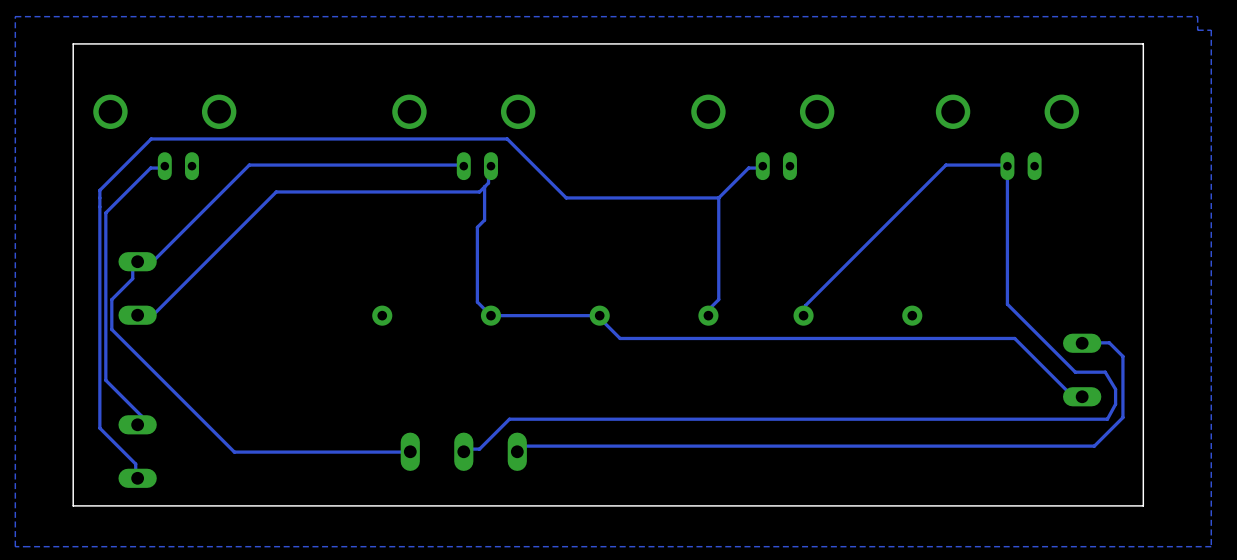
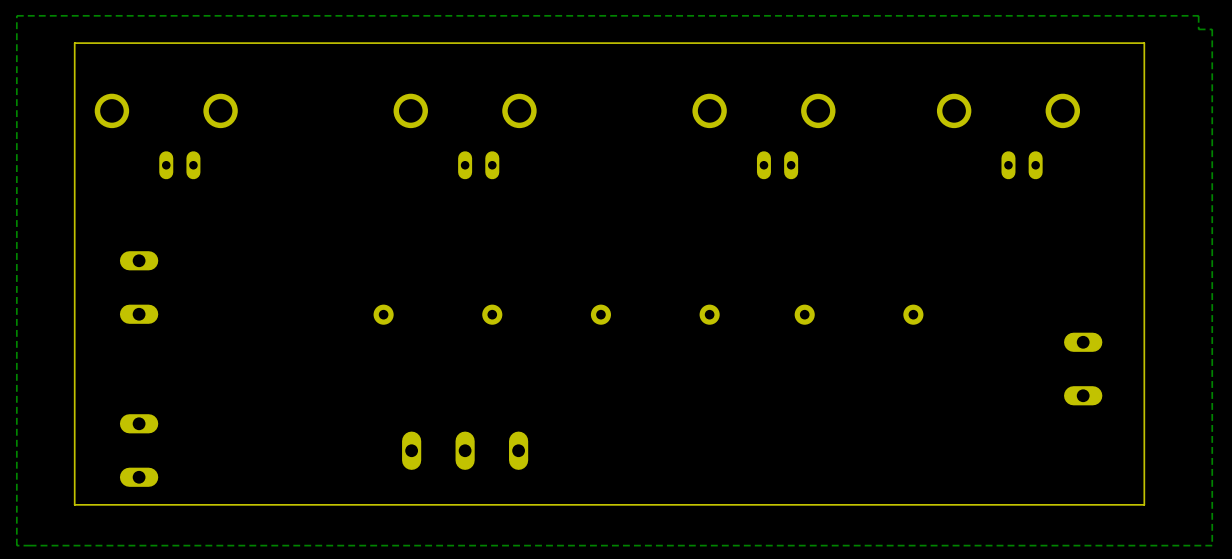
track: (164, 166) (162, 168) (150, 168) (105, 212) (105, 380) (141, 416) (137, 424) -> none
track: (463, 166) (249, 165) (153, 260) (137, 261) (132, 266) (132, 278) (111, 299) (111, 329) (234, 452) (410, 451) -> none
track: (490, 166) (488, 168) (488, 183) (479, 191) (276, 191) (153, 314) (137, 315) -> none
track: (762, 166) (760, 168) (748, 168) (718, 197) -> none
track: (1007, 166) (945, 165) (805, 305) (805, 314) (803, 315) -> none
track: (1007, 172) (1007, 304) (1075, 372) (1105, 372) (1115, 389) (1115, 404) (1107, 419) (509, 419) (479, 449) (464, 449) (463, 451) -> none
track: (484, 186) (484, 220) (477, 227) (477, 302) (490, 315) (597, 315) (620, 338) (1014, 338) (1071, 395) (1086, 395) (1082, 396) -> none
track: (718, 197) (718, 299) (709, 308) (708, 315) -> none
track: (718, 197) (566, 197) (507, 138) (151, 138) (99, 190) (99, 428) (135, 464) (135, 476) (137, 478) -> none
track: (1082, 343) (1109, 342) (1122, 356) (1122, 417) (1094, 446) (521, 446) (517, 451) -> none

